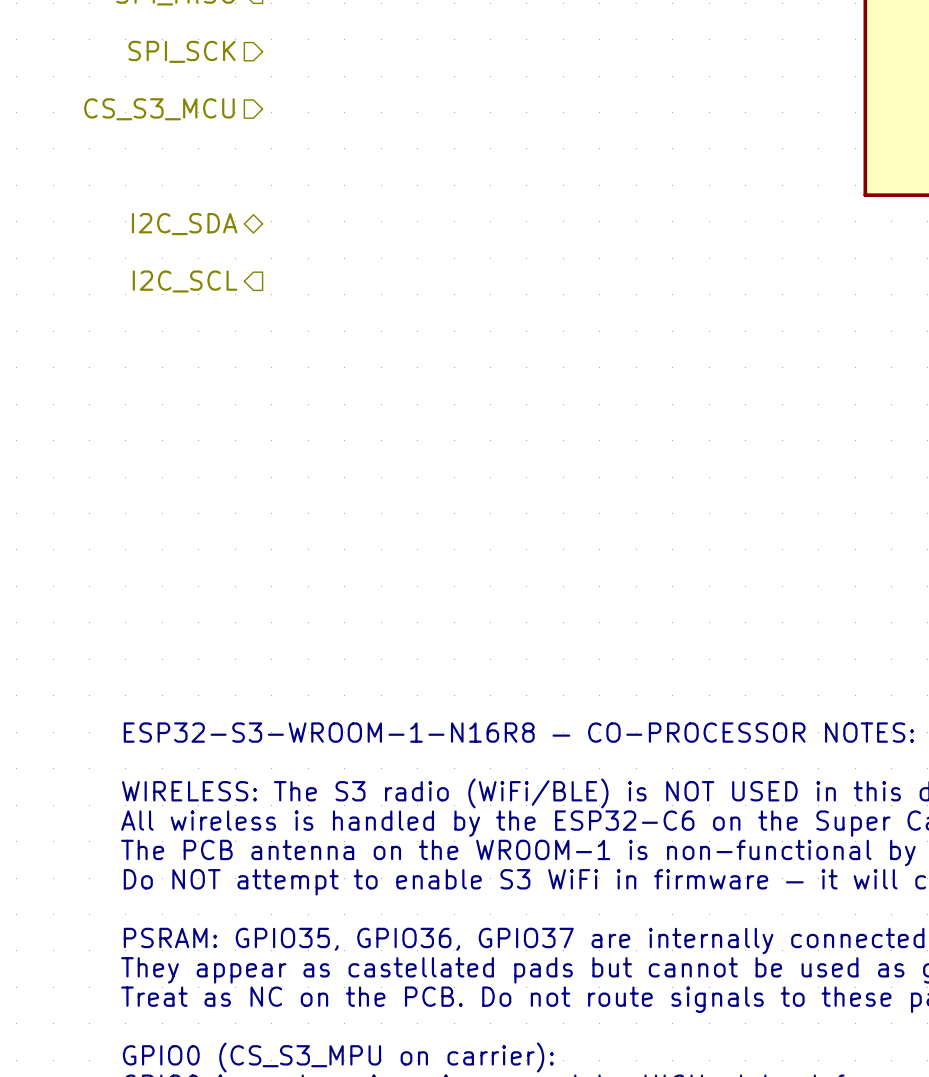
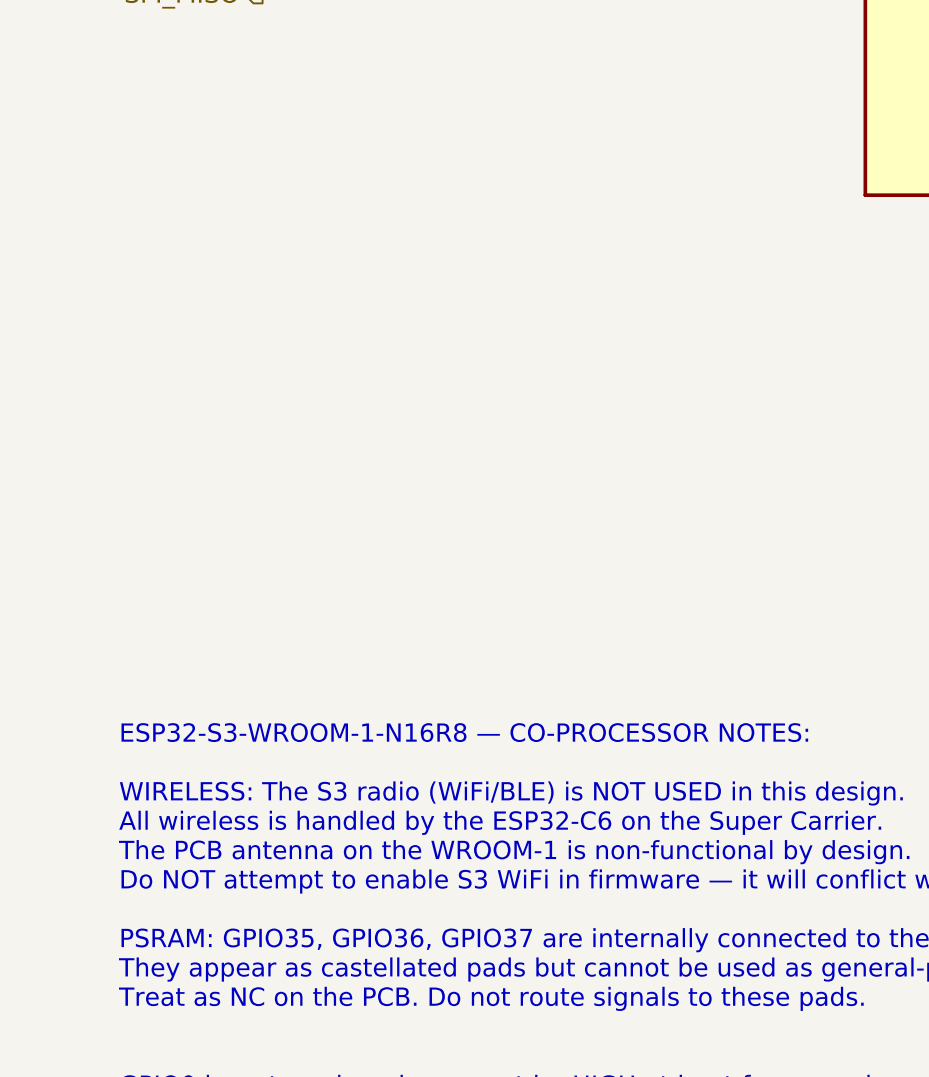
hierarchical label: SPI_SCK (182, 51) -> none
hierarchical label: CS_S3_MCU (159, 109) -> none
hierarchical label: I2C_SDA (184, 224) -> none
hierarchical label: I2C_SCL (185, 281) -> none
text: GPIO0 (CS_S3_MPU on carrier): (338, 1057) -> none

